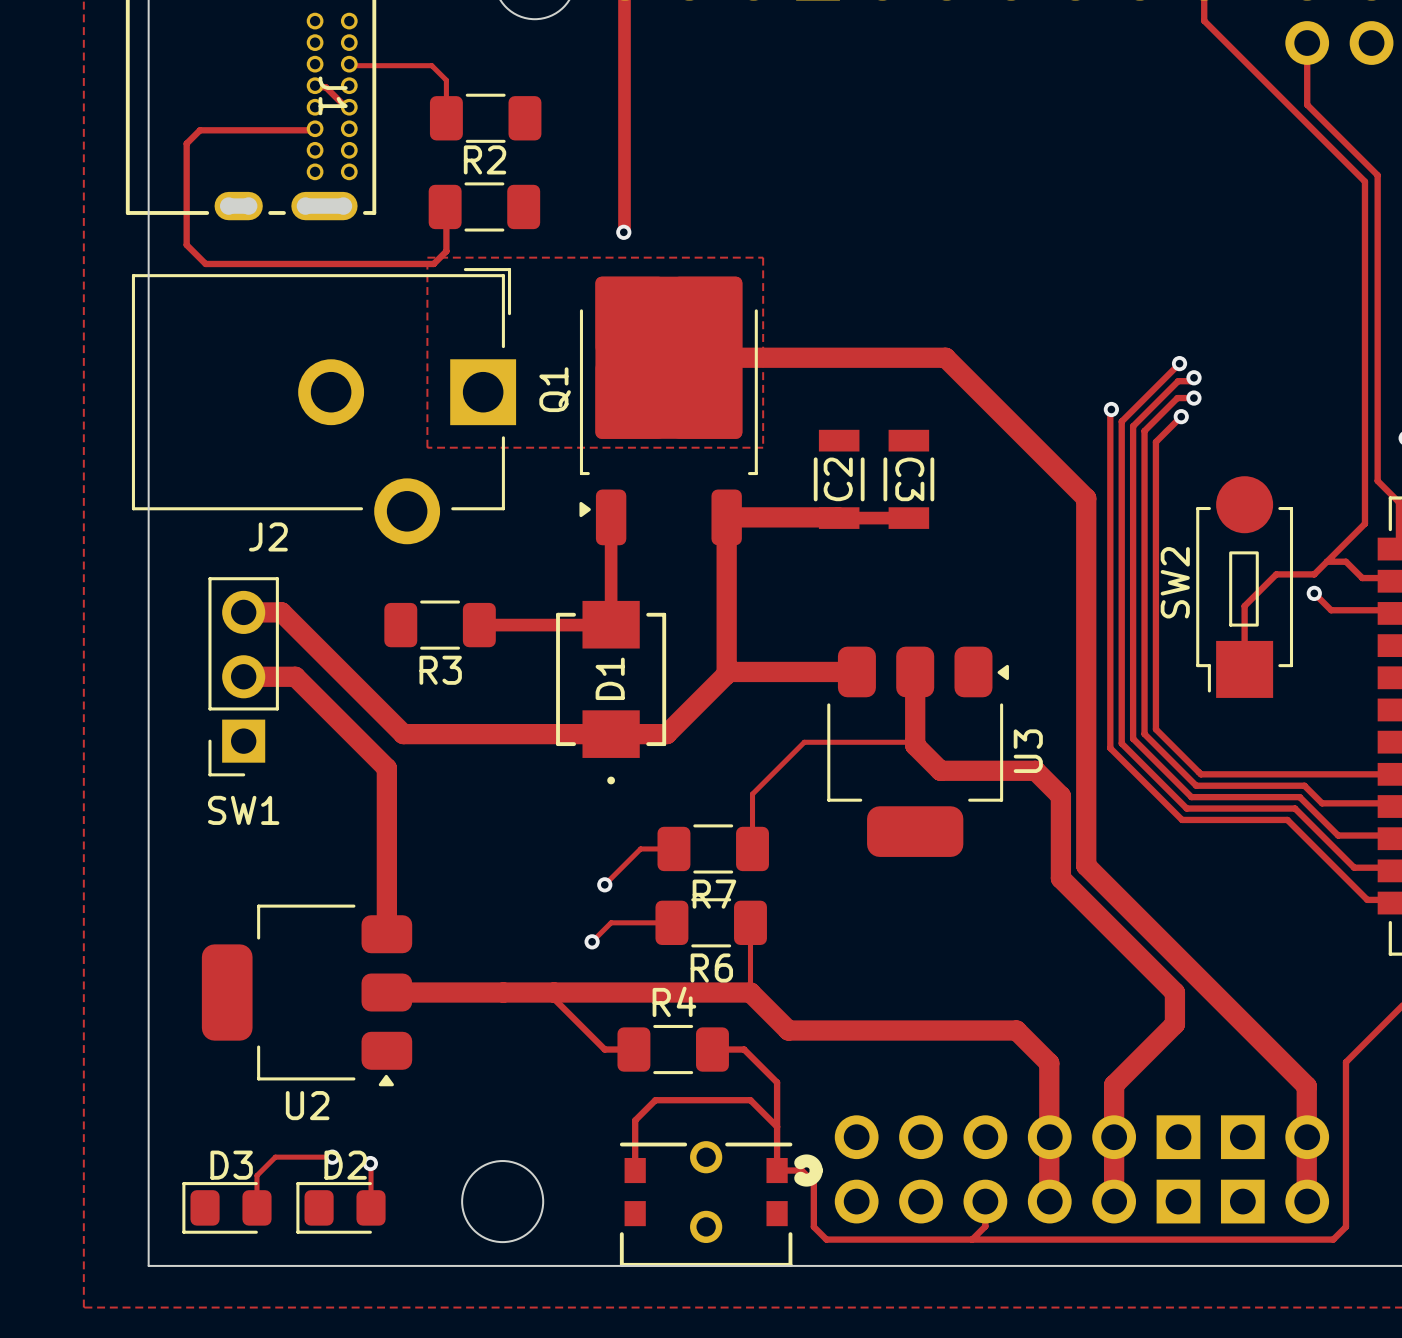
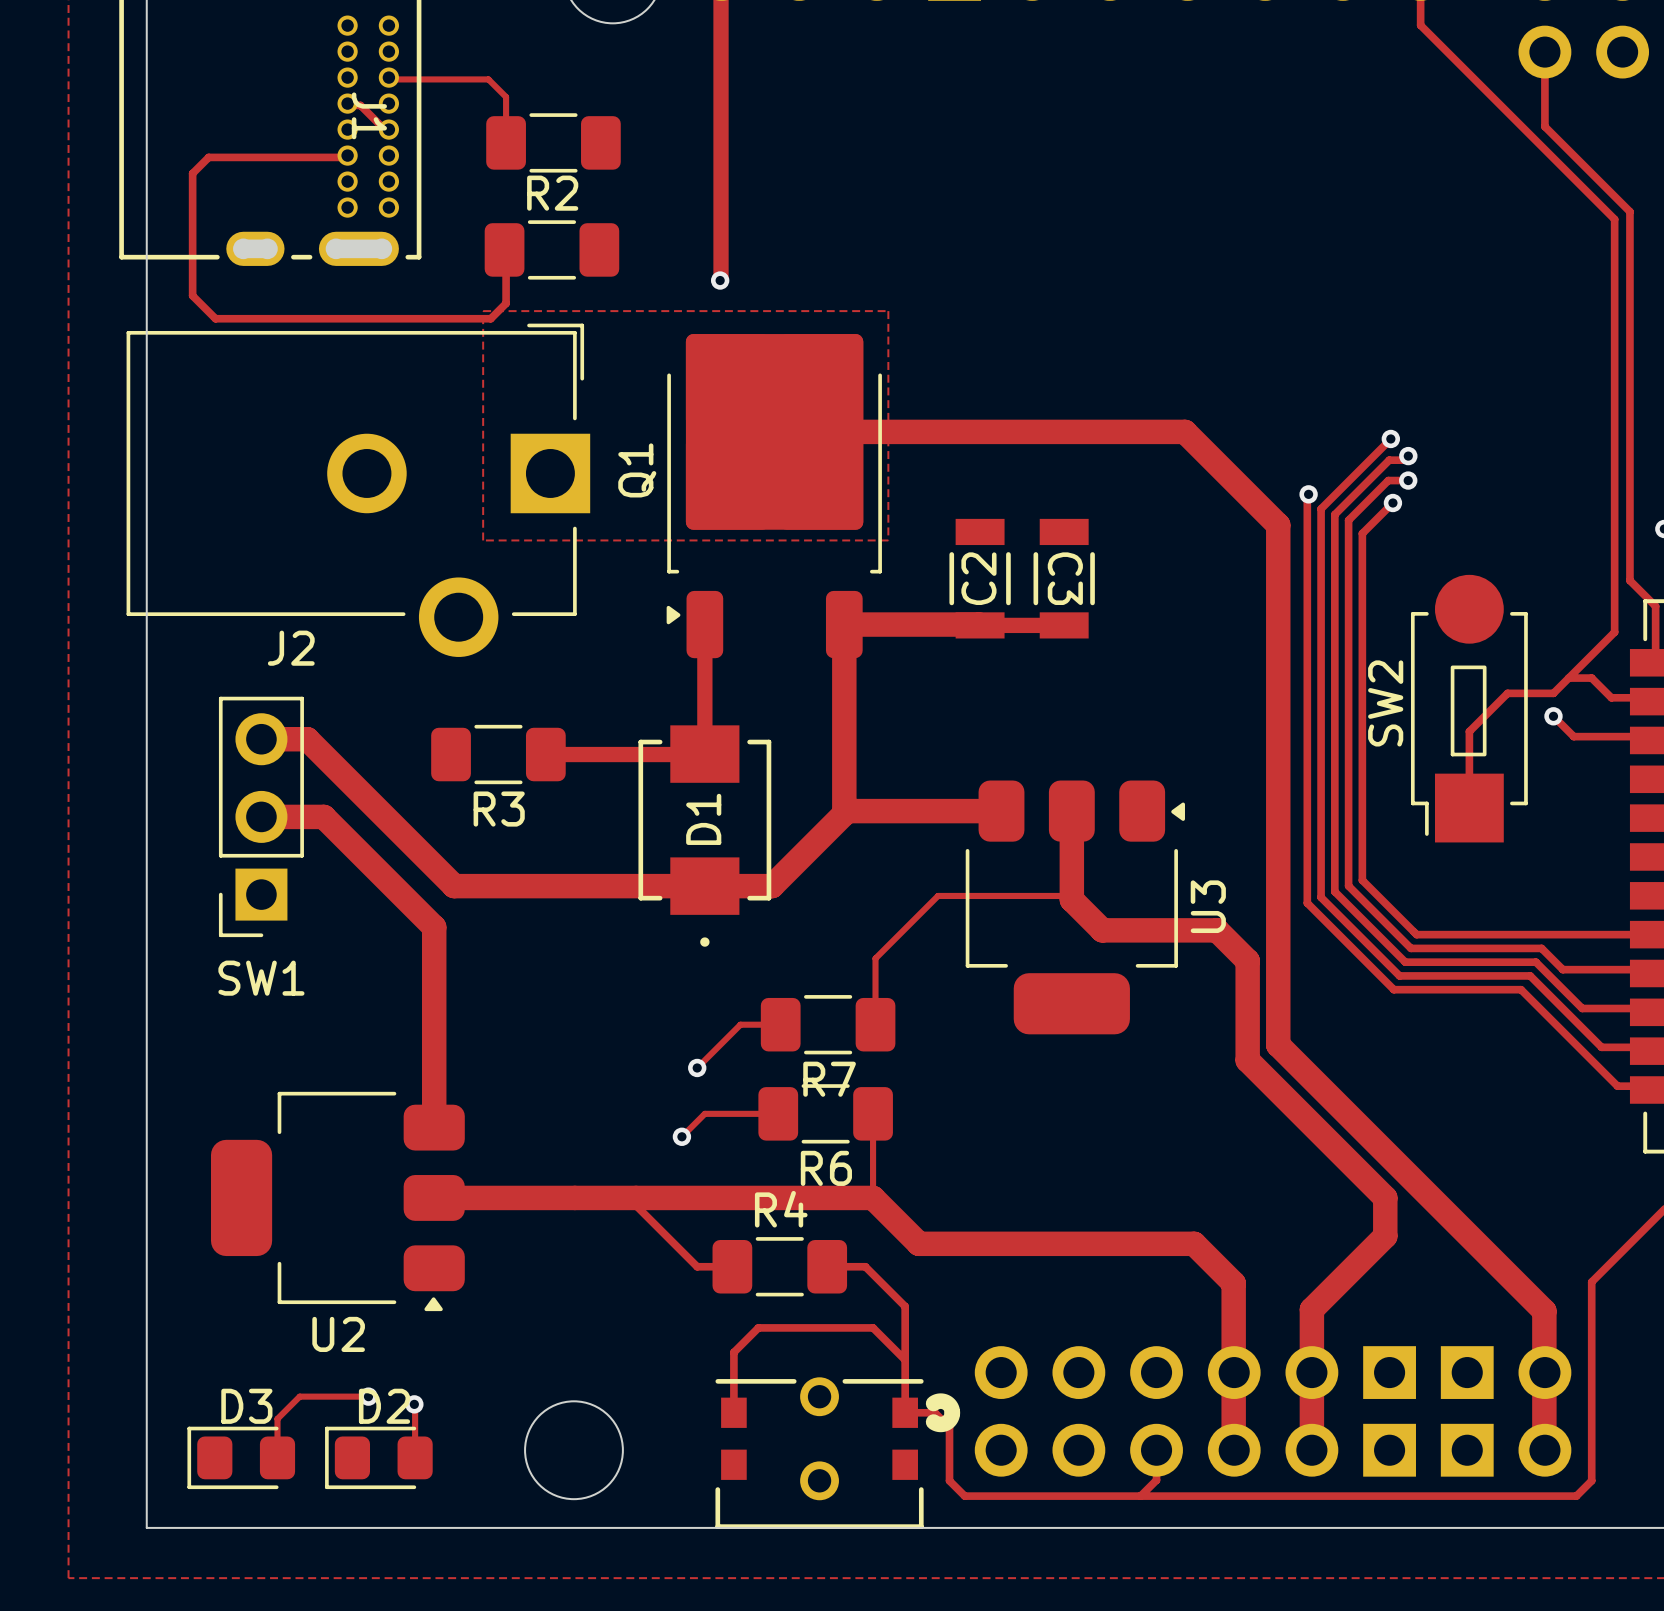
track: (945, 357) (1086, 498) -> (1108, 431) (1184, 431) (1278, 525) (1278, 601)

